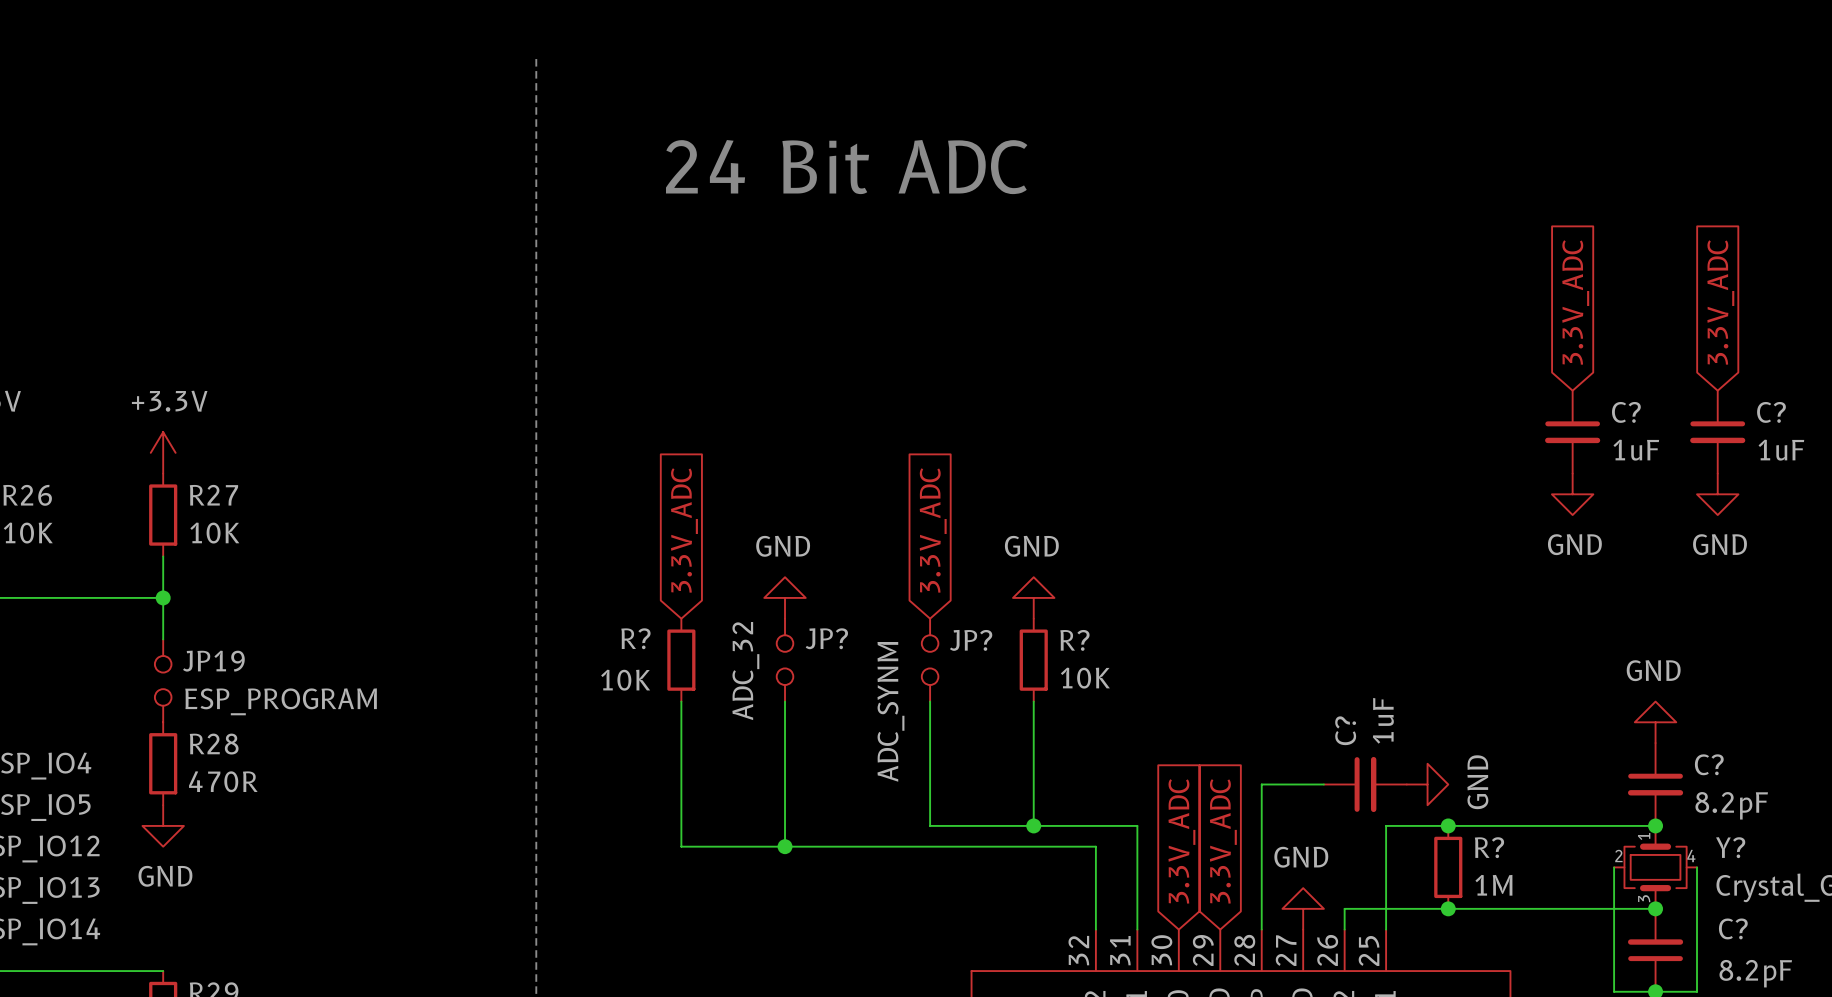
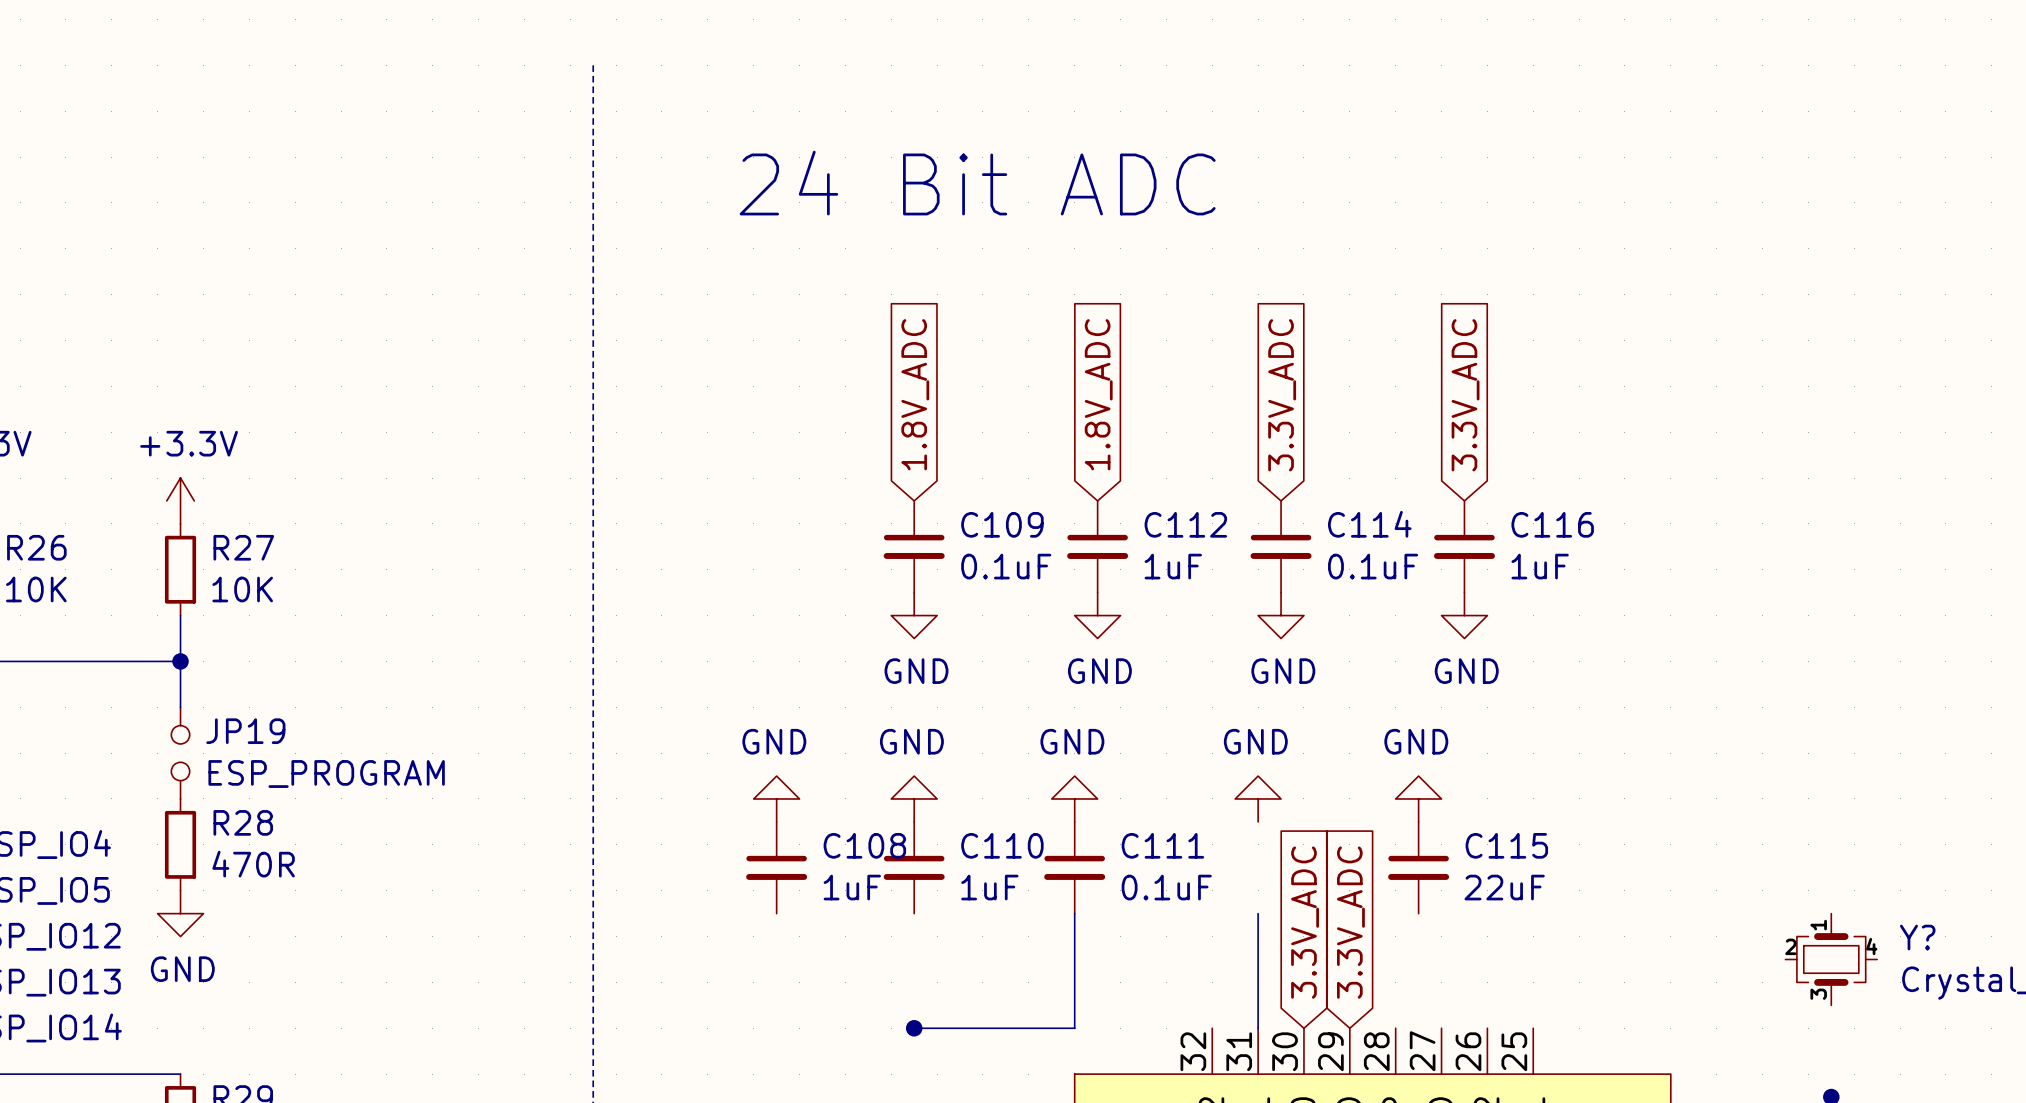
global label: 3.3V_ADC (1575, 302) -> none
global label: 3.3V_ADC (1720, 302) -> none
global label: none -> 1.8V_ADC (915, 394)
global label: none -> 1.8V_ADC (1098, 394)
global label: none -> 3.3V_ADC (1282, 395)
global label: none -> 3.3V_ADC (1465, 395)
C?: 1uF (1572, 432) -> none
C?: 1uF (1717, 432) -> none
C109: none -> 0.1uF (914, 546)
C112: none -> 1uF (1097, 546)
C114: none -> 0.1uF (1281, 546)
C116: none -> 1uF (1464, 546)
power symbol: GND (1572, 494) -> none
power symbol: GND (1717, 494) -> none
global label: 3.3V_ADC (684, 530) -> none
global label: 3.3V_ADC (933, 530) -> none
power symbol: none -> GND (1281, 615)
power symbol: none -> GND (1464, 615)
power symbol rotation: 0° (785, 597) -> 180° (914, 615)
power symbol position: GND (785, 597) -> GND (914, 615)
power symbol rotation: 0° (1033, 597) -> 180° (1097, 615)
power symbol position: GND (1033, 597) -> GND (1097, 615)
R?: 10K (681, 660) -> none
JP?: ADC_32 (785, 660) -> none
JP?: ADC_SYNM (930, 660) -> none
R?: 10K (1033, 660) -> none
wire: (681, 701) (681, 846) (1095, 846) (1095, 929) -> none
wire: (785, 701) (785, 846) -> none
wire: (930, 701) (930, 825) (1137, 825) -> none
wire: (1033, 701) (1033, 825) -> none
power symbol: none -> GND (776, 798)
power symbol: none -> GND (914, 798)
power symbol: none -> GND (1074, 798)
power symbol: none -> GND (1258, 798)
power symbol: none -> GND (1418, 798)
power symbol: GND (1655, 722) -> none
C108: none -> 1uF (776, 867)
C110: none -> 1uF (914, 867)
C111: none -> 0.1uF (1074, 867)
C115: none -> 22uF (1418, 867)
wire: (1323, 784) (1261, 784) (1261, 929) -> none
C?: 1uF (1365, 784) -> none
power symbol: GND (1427, 784) -> none
C?: 8.2pF (1655, 784) -> none
wire: none -> (1074, 913) (1074, 1028) (914, 1028)
junction: (1033, 825) -> none
junction: (1448, 825) -> none
wire: (1655, 825) (1386, 825) (1386, 929) -> none
junction: (1655, 825) -> none
junction position: (785, 846) -> (914, 1028)
R?: 1M (1448, 867) -> none
wire: (1614, 867) (1614, 991) (1697, 991) (1697, 867) -> none
power symbol: GND (1303, 908) -> none
junction: (1448, 908) -> none
wire: (1655, 908) (1344, 908) (1344, 929) -> none
junction: (1655, 908) -> none
C?: 8.2pF (1655, 950) -> none

